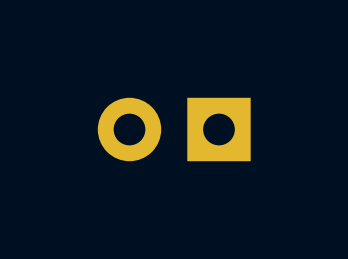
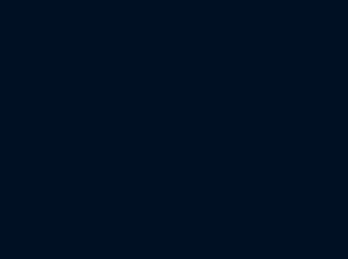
part: (174, 129) -> none

